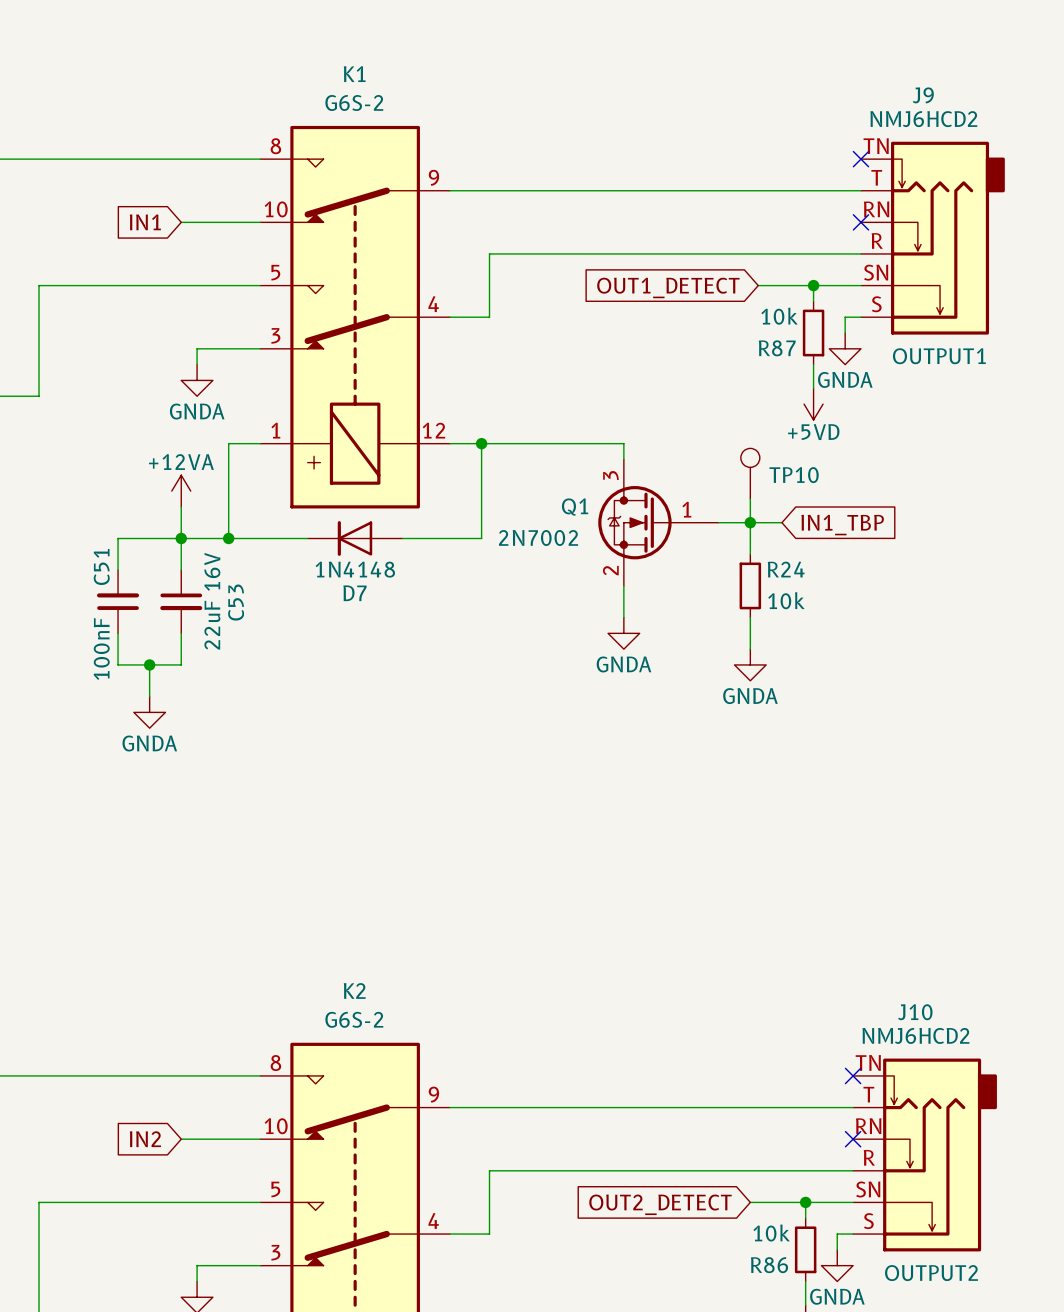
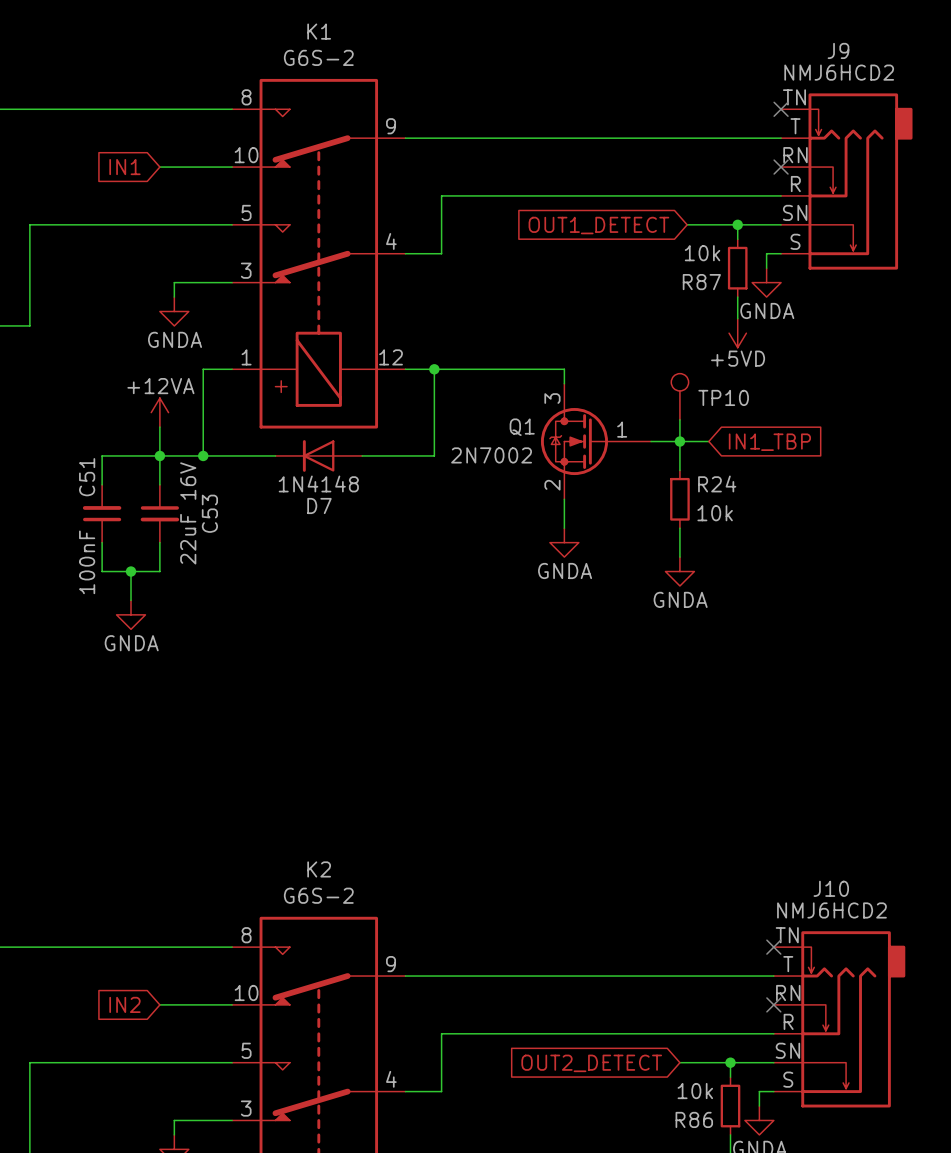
J9 text: OUTPUT1 (939, 356) -> none
J10 text: OUTPUT2 (931, 1273) -> none

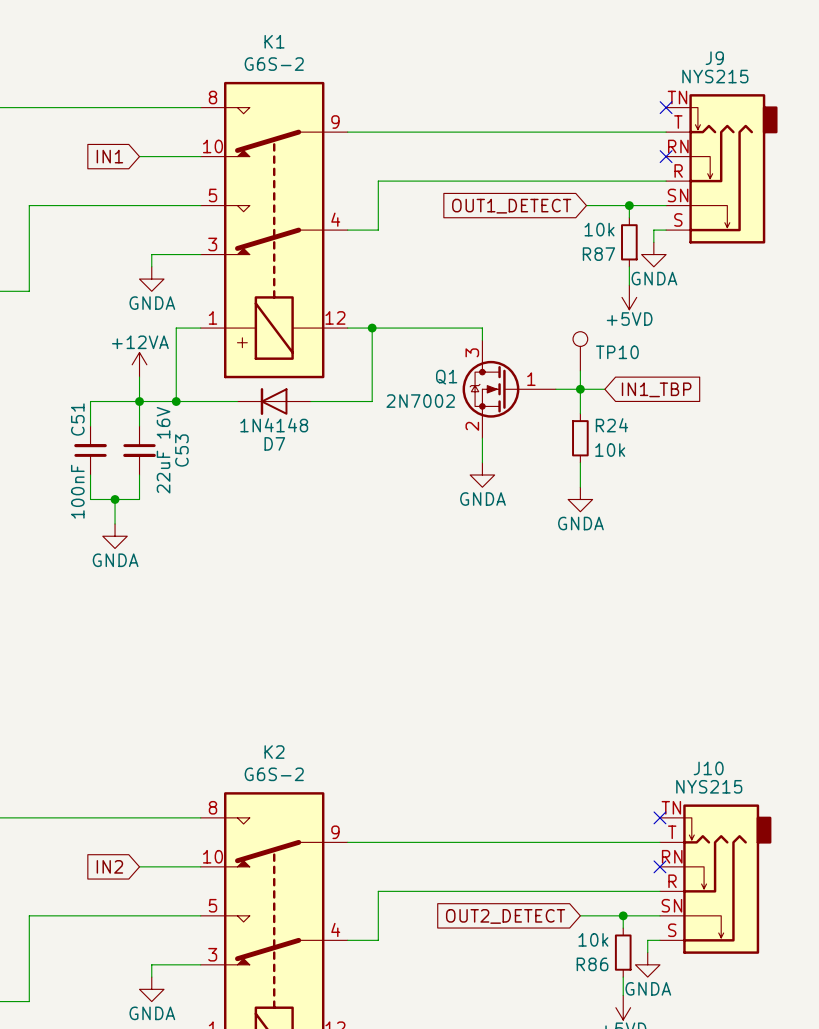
J9 value: NMJ6HCD2 (839, 72) -> NYS215 (715, 76)
J10 value: NMJ6HCD2 (831, 910) -> NYS215 (709, 786)

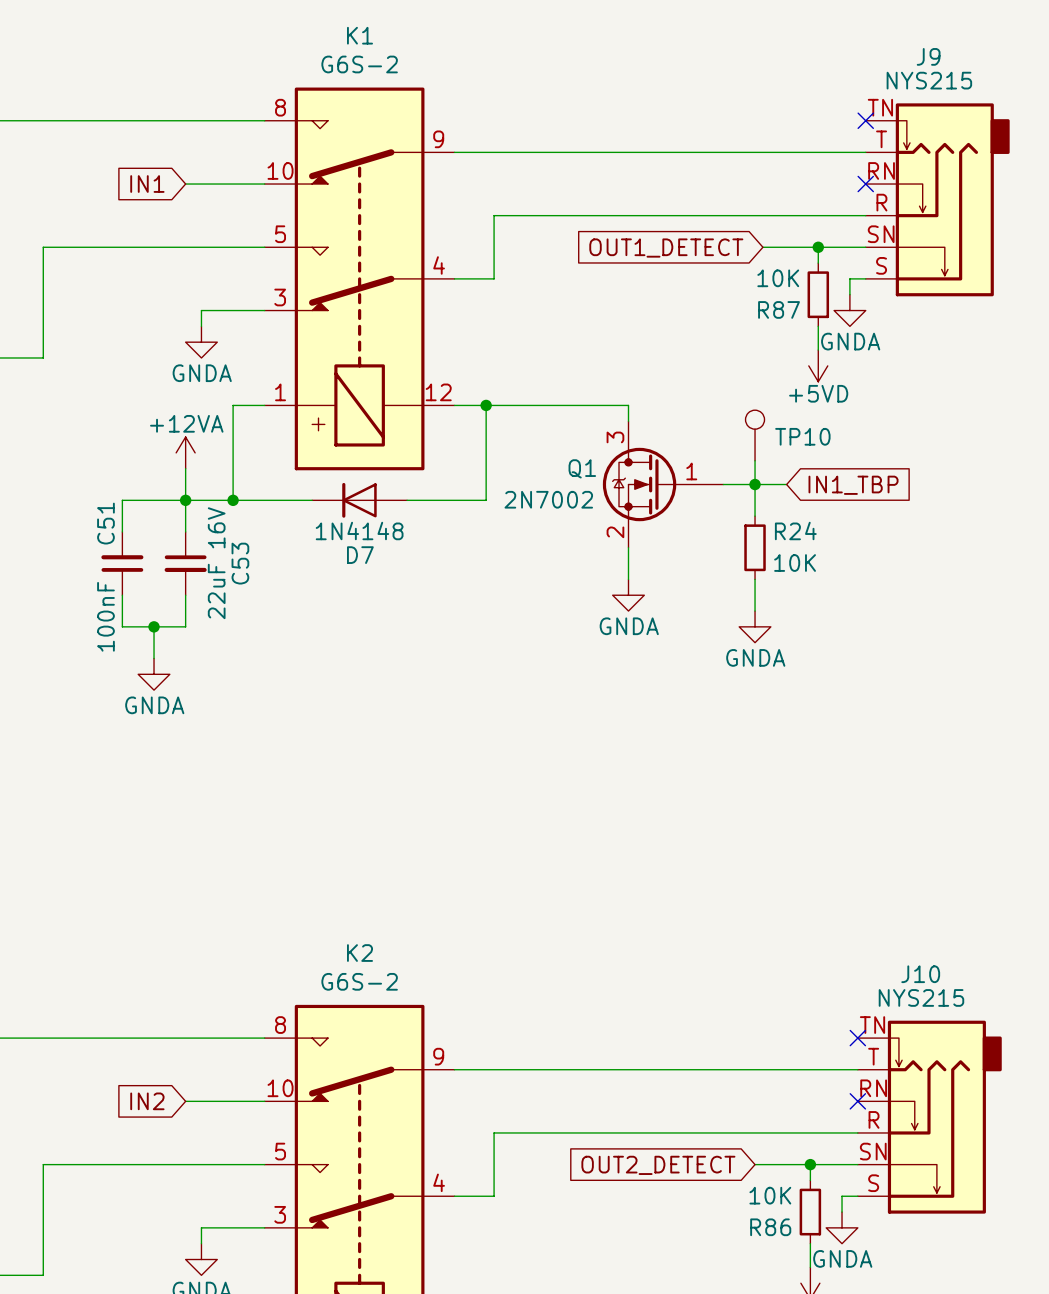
R87 value: 10k (599, 229) -> 10K (778, 278)
R24 value: 10k (610, 450) -> 10K (795, 563)
R86 value: 10k (593, 939) -> 10K (770, 1195)

